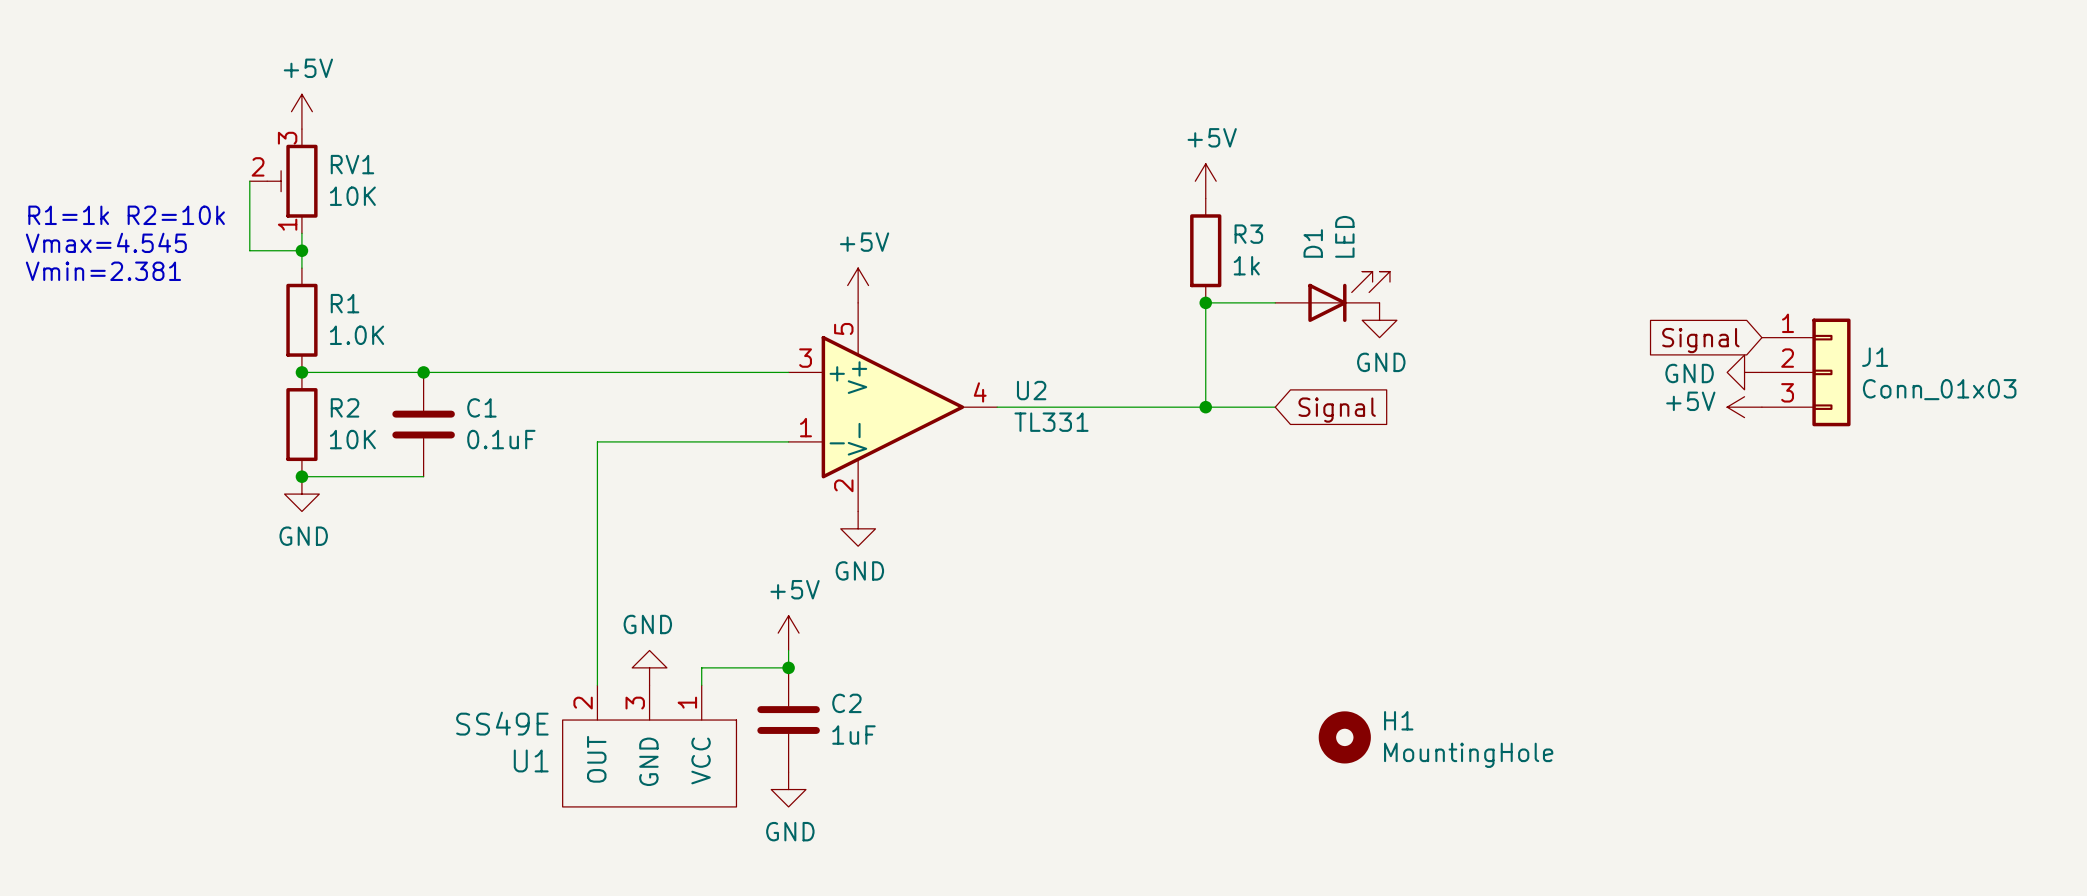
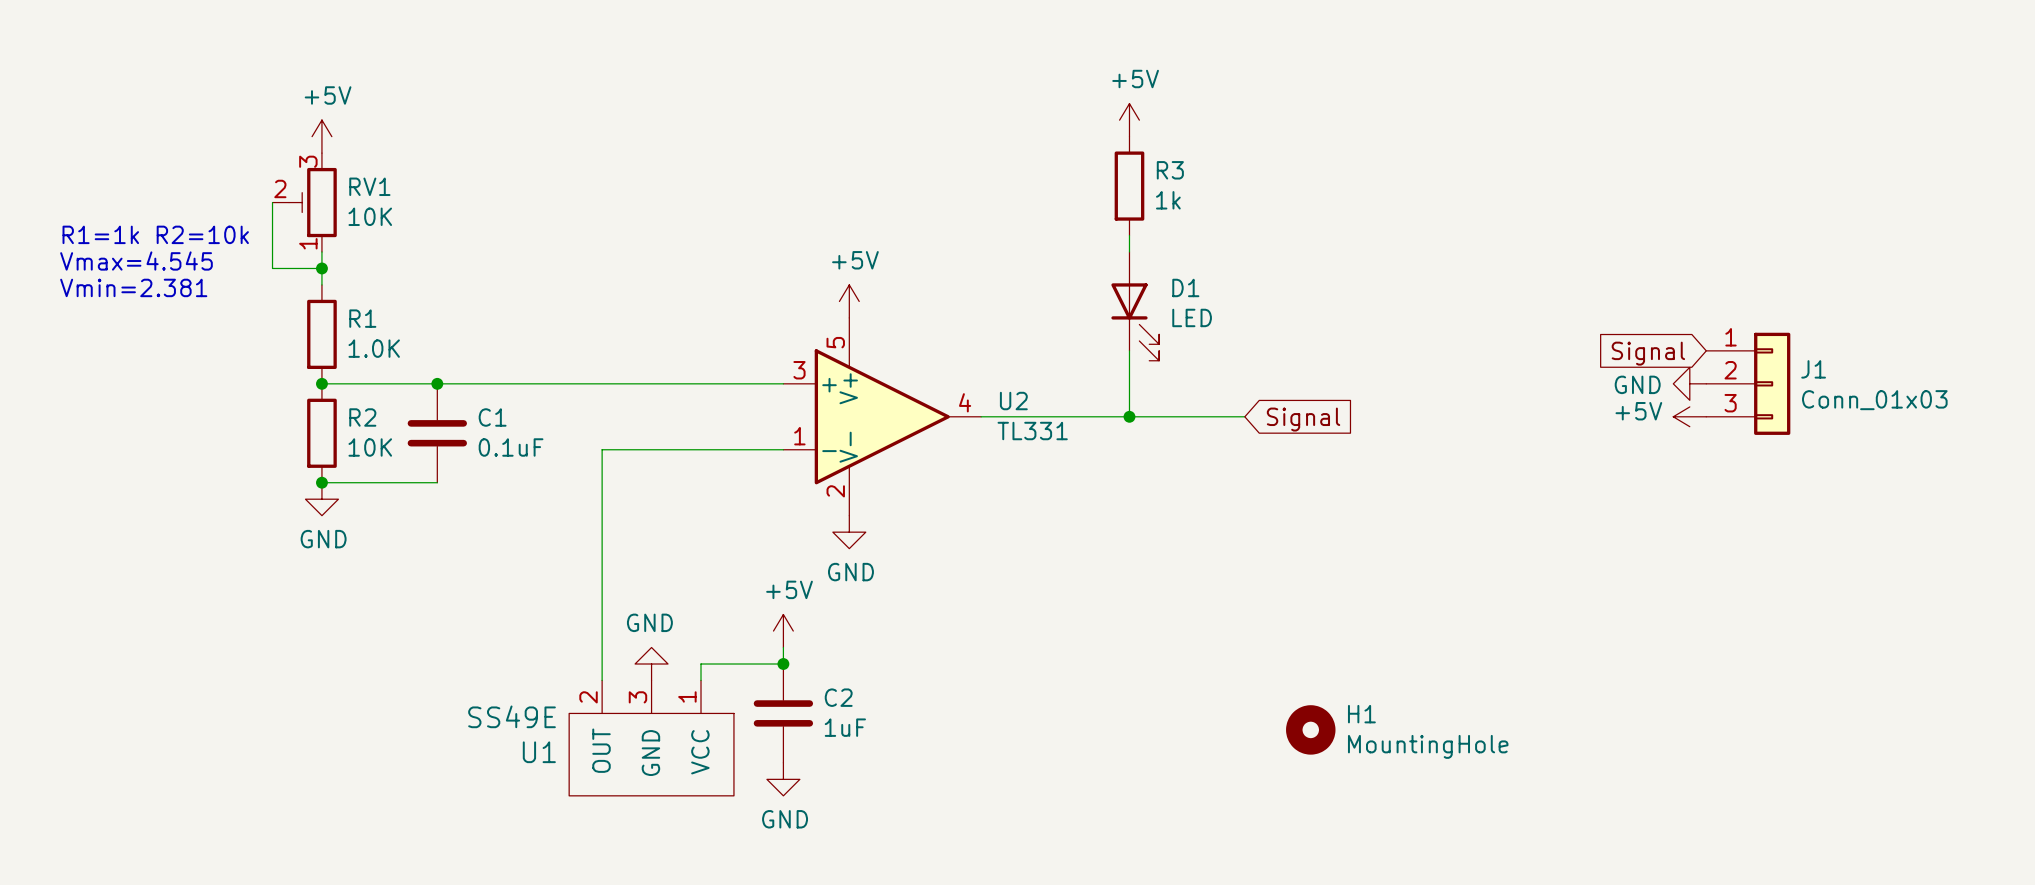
power symbol position: +5V (1205, 181) -> +5V (1129, 120)
wire: none -> (1129, 235) (1129, 251)
R3 position: (1205, 250) -> (1129, 186)
D1 position: (1332, 296) -> (1135, 306)
D1 rotation: 0° (1349, 296) -> 90° clockwise (1135, 322)
junction: (1205, 302) -> none
wire: (1275, 302) (1205, 302) (1205, 407) -> none
power symbol: GND (1379, 320) -> none
wire: none -> (1129, 350) (1129, 416)
junction position: (1205, 407) -> (1129, 416)

